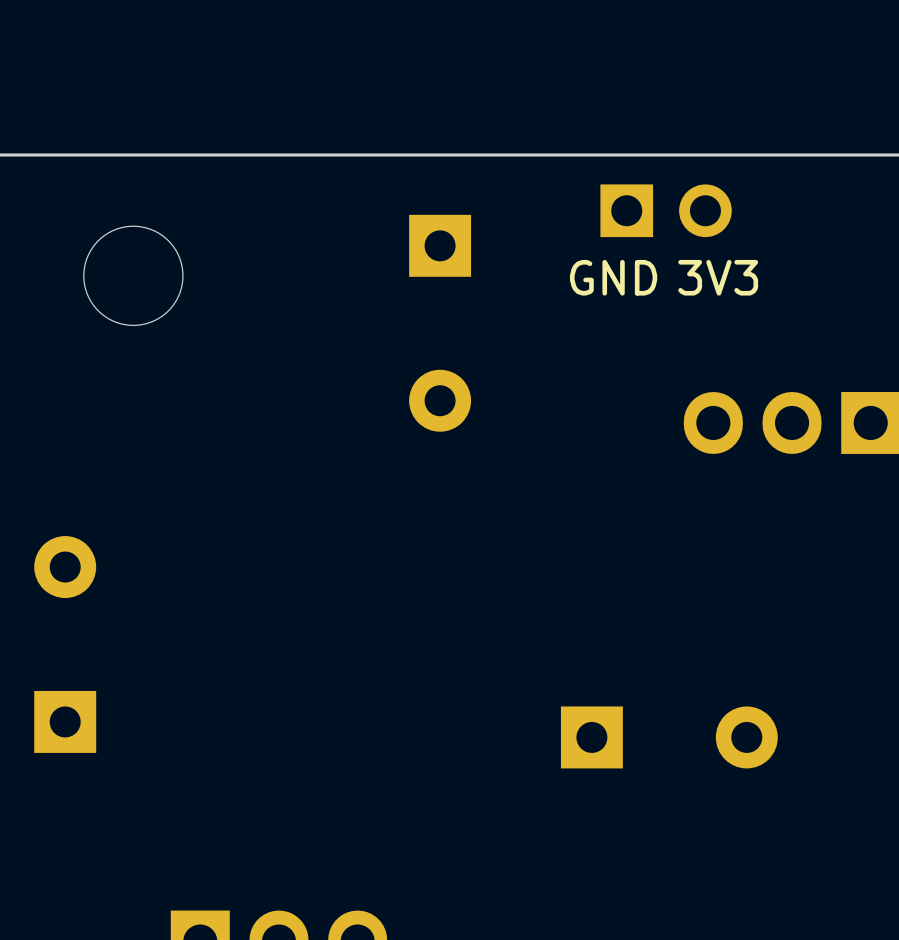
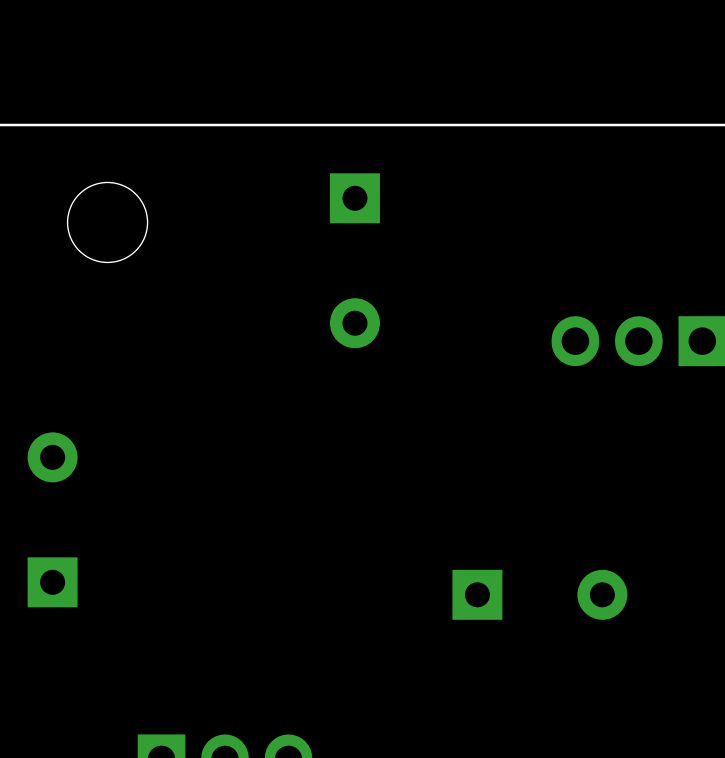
part: (666, 210) -> none
text: GND (613, 277) -> none
text: 3V3 (718, 277) -> none

